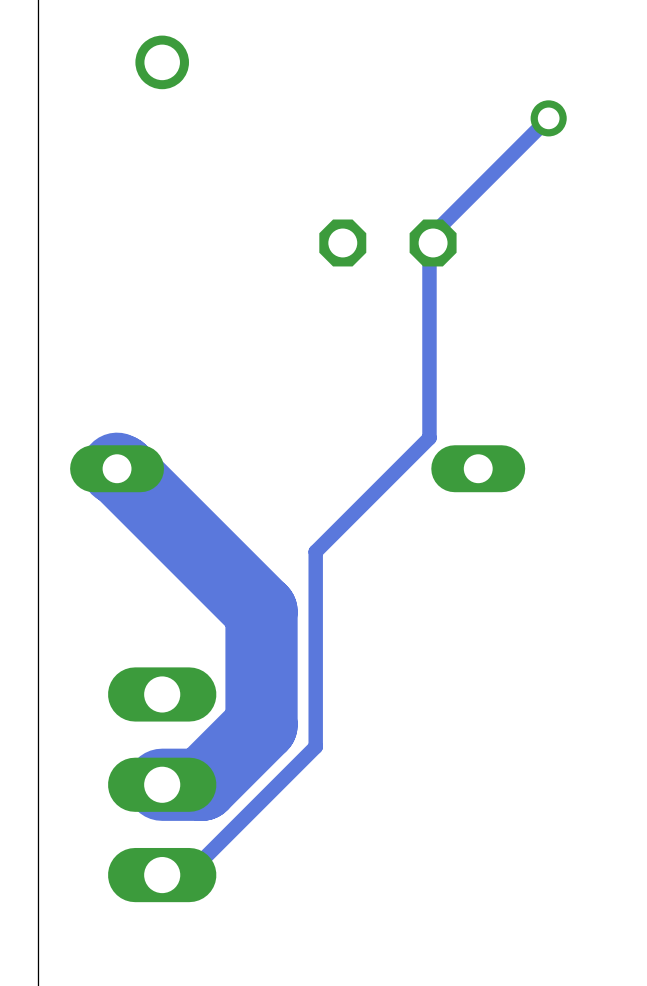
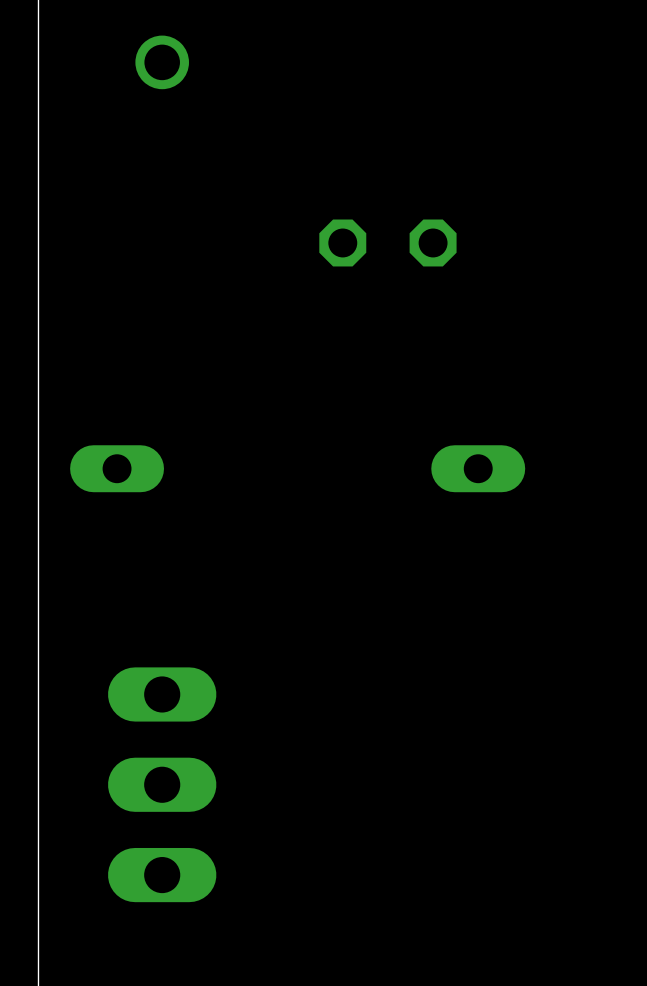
track: (548, 118) (429, 237) (433, 242) (429, 242) (429, 438) (315, 551) (315, 746) (191, 871) (164, 871) (162, 875) -> none
via: (548, 118) -> none
track: (117, 468) (261, 611) (261, 725) (201, 784) (162, 784) -> none

